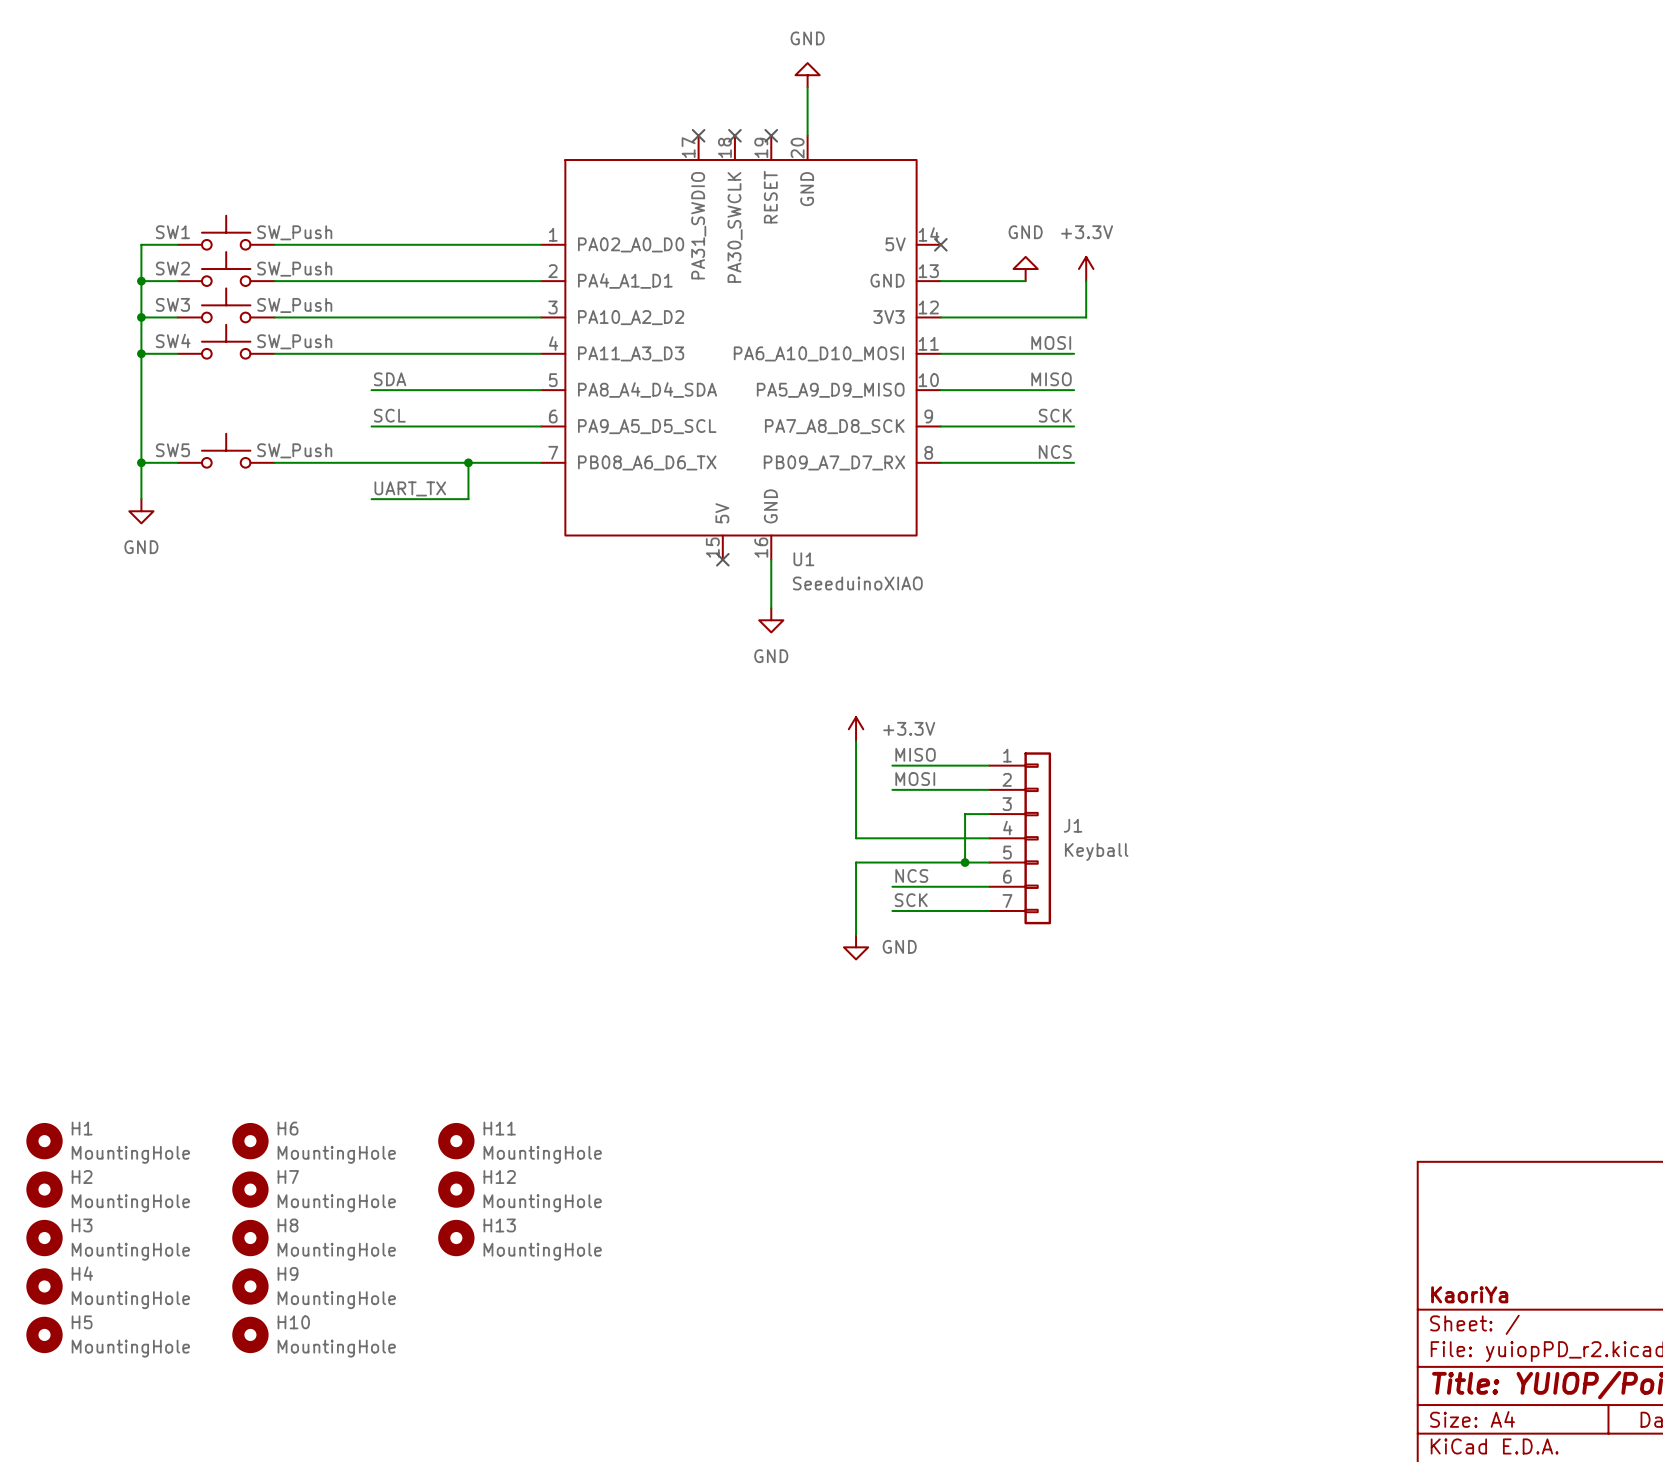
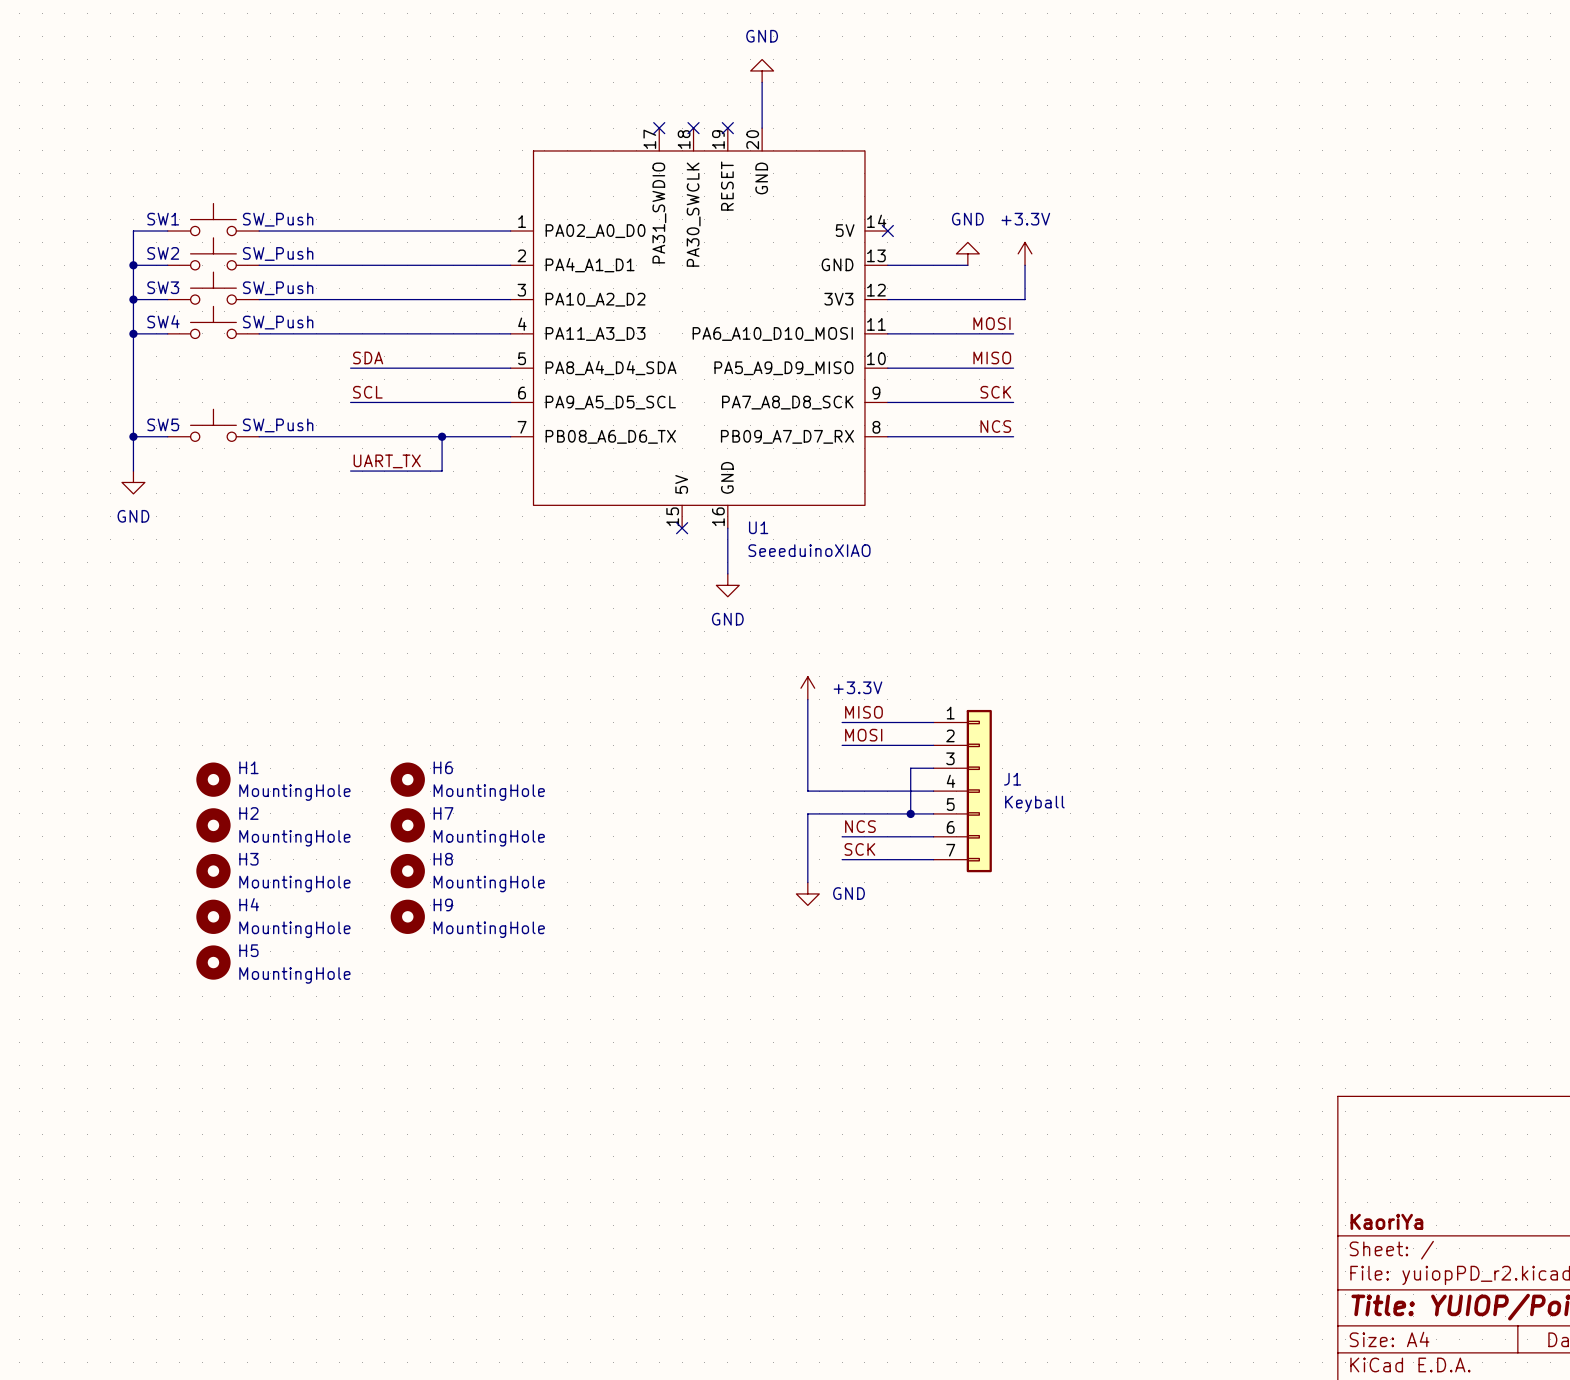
H1 position: (44, 1141) -> (213, 779)
H6 position: (250, 1141) -> (407, 779)
H11: MountingHole (456, 1141) -> none
H2 position: (44, 1189) -> (213, 825)
H7 position: (250, 1189) -> (407, 825)
H12: MountingHole (456, 1189) -> none
H3 position: (44, 1238) -> (213, 871)
H8 position: (250, 1238) -> (407, 871)
H13: MountingHole (456, 1238) -> none
H4 position: (44, 1286) -> (213, 916)
H9 position: (250, 1286) -> (407, 916)
H5 position: (44, 1334) -> (213, 962)
H10: MountingHole (250, 1334) -> none

